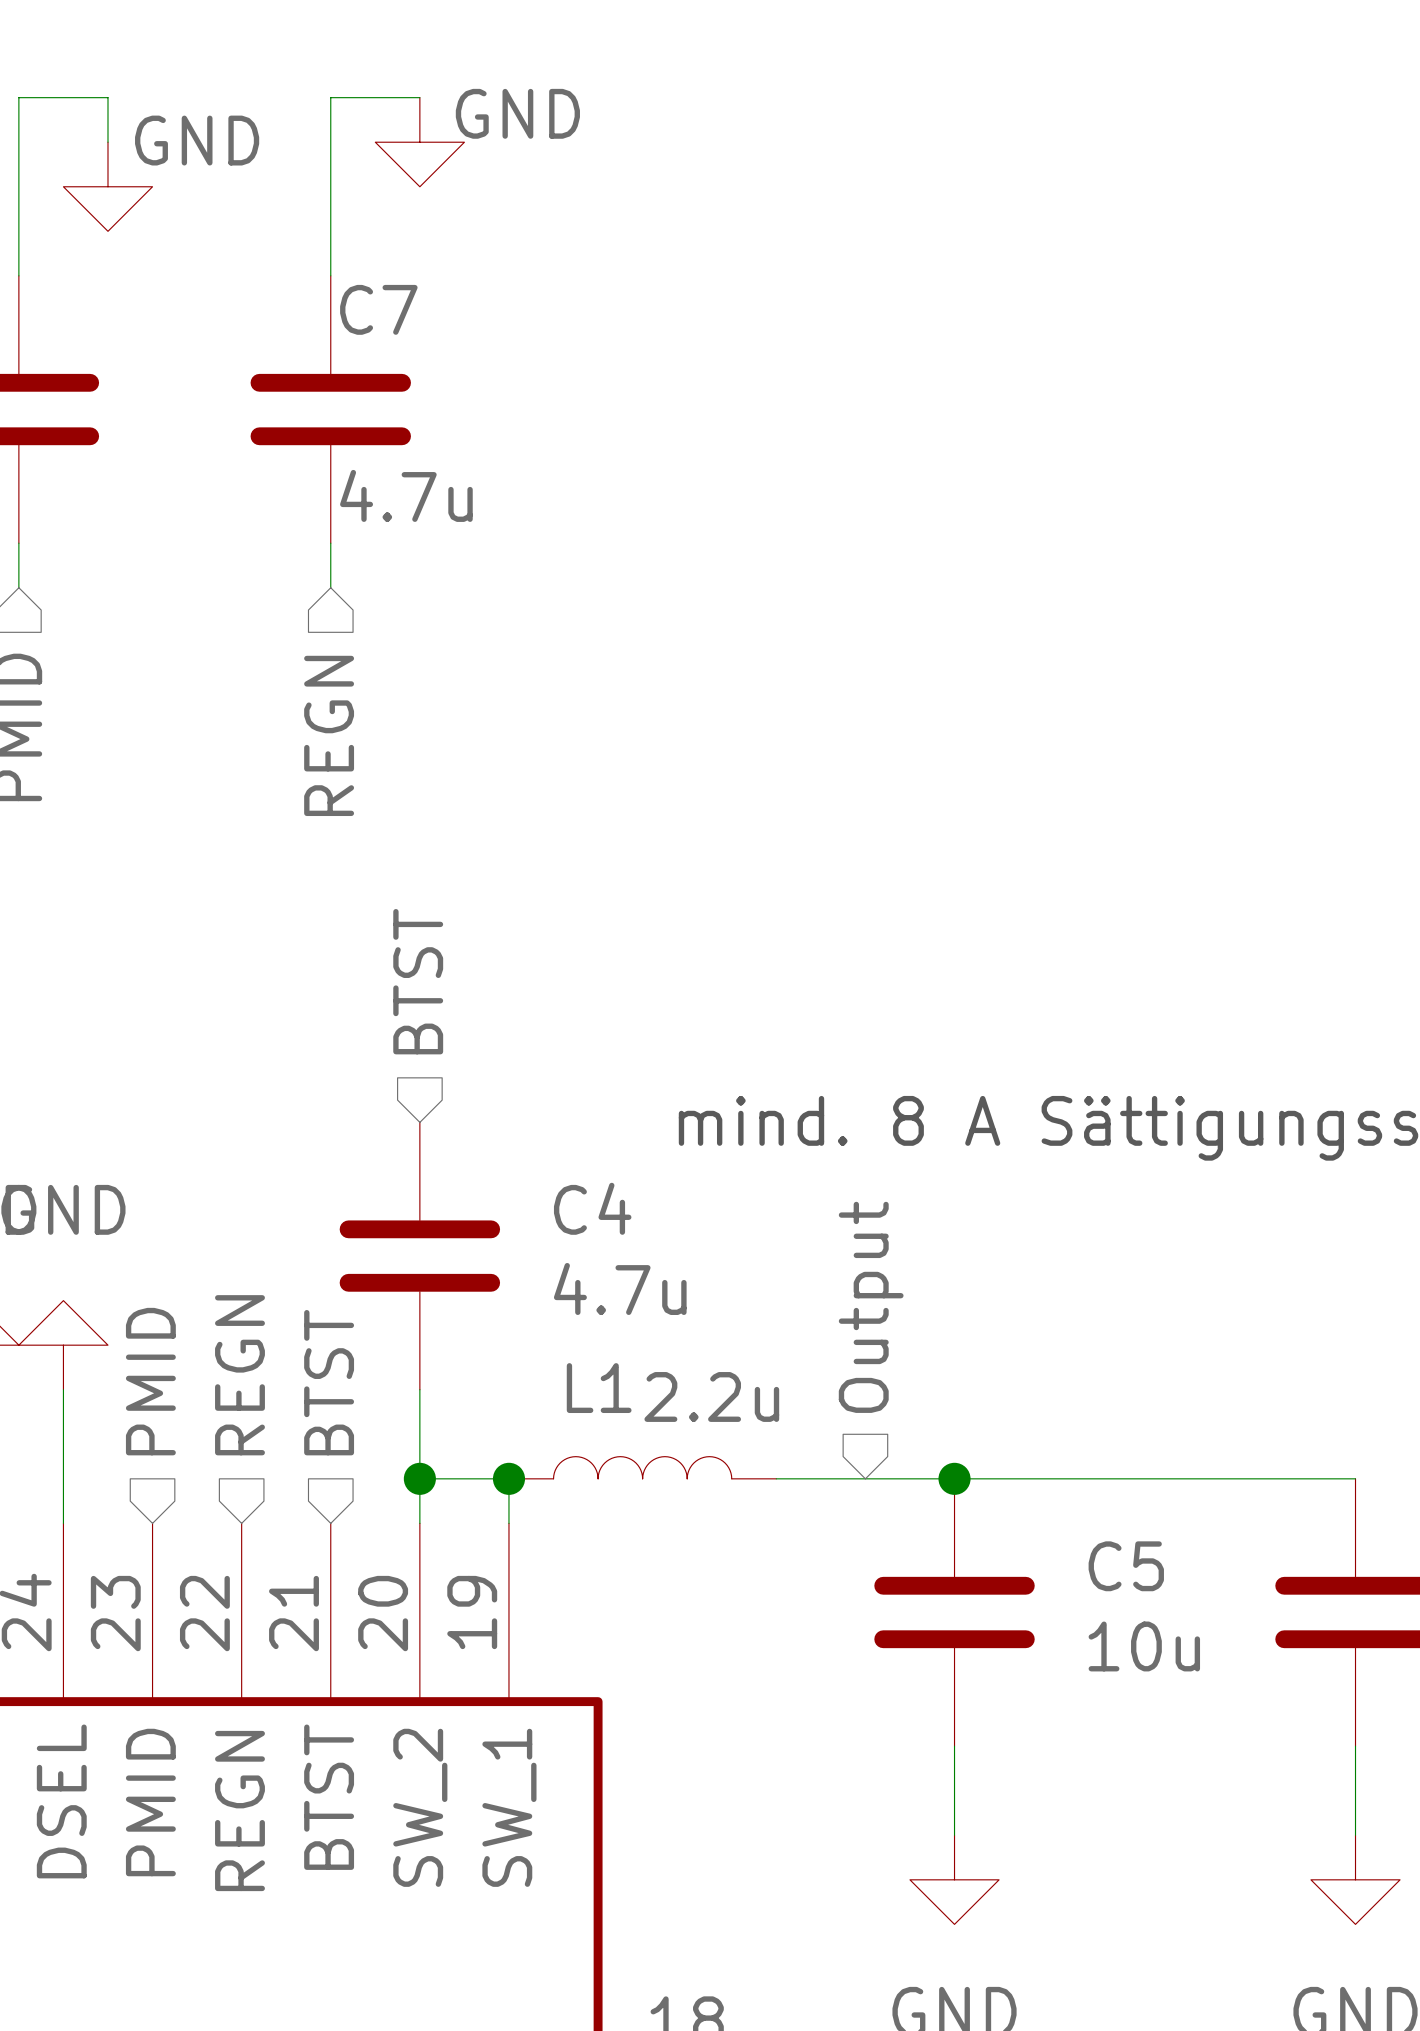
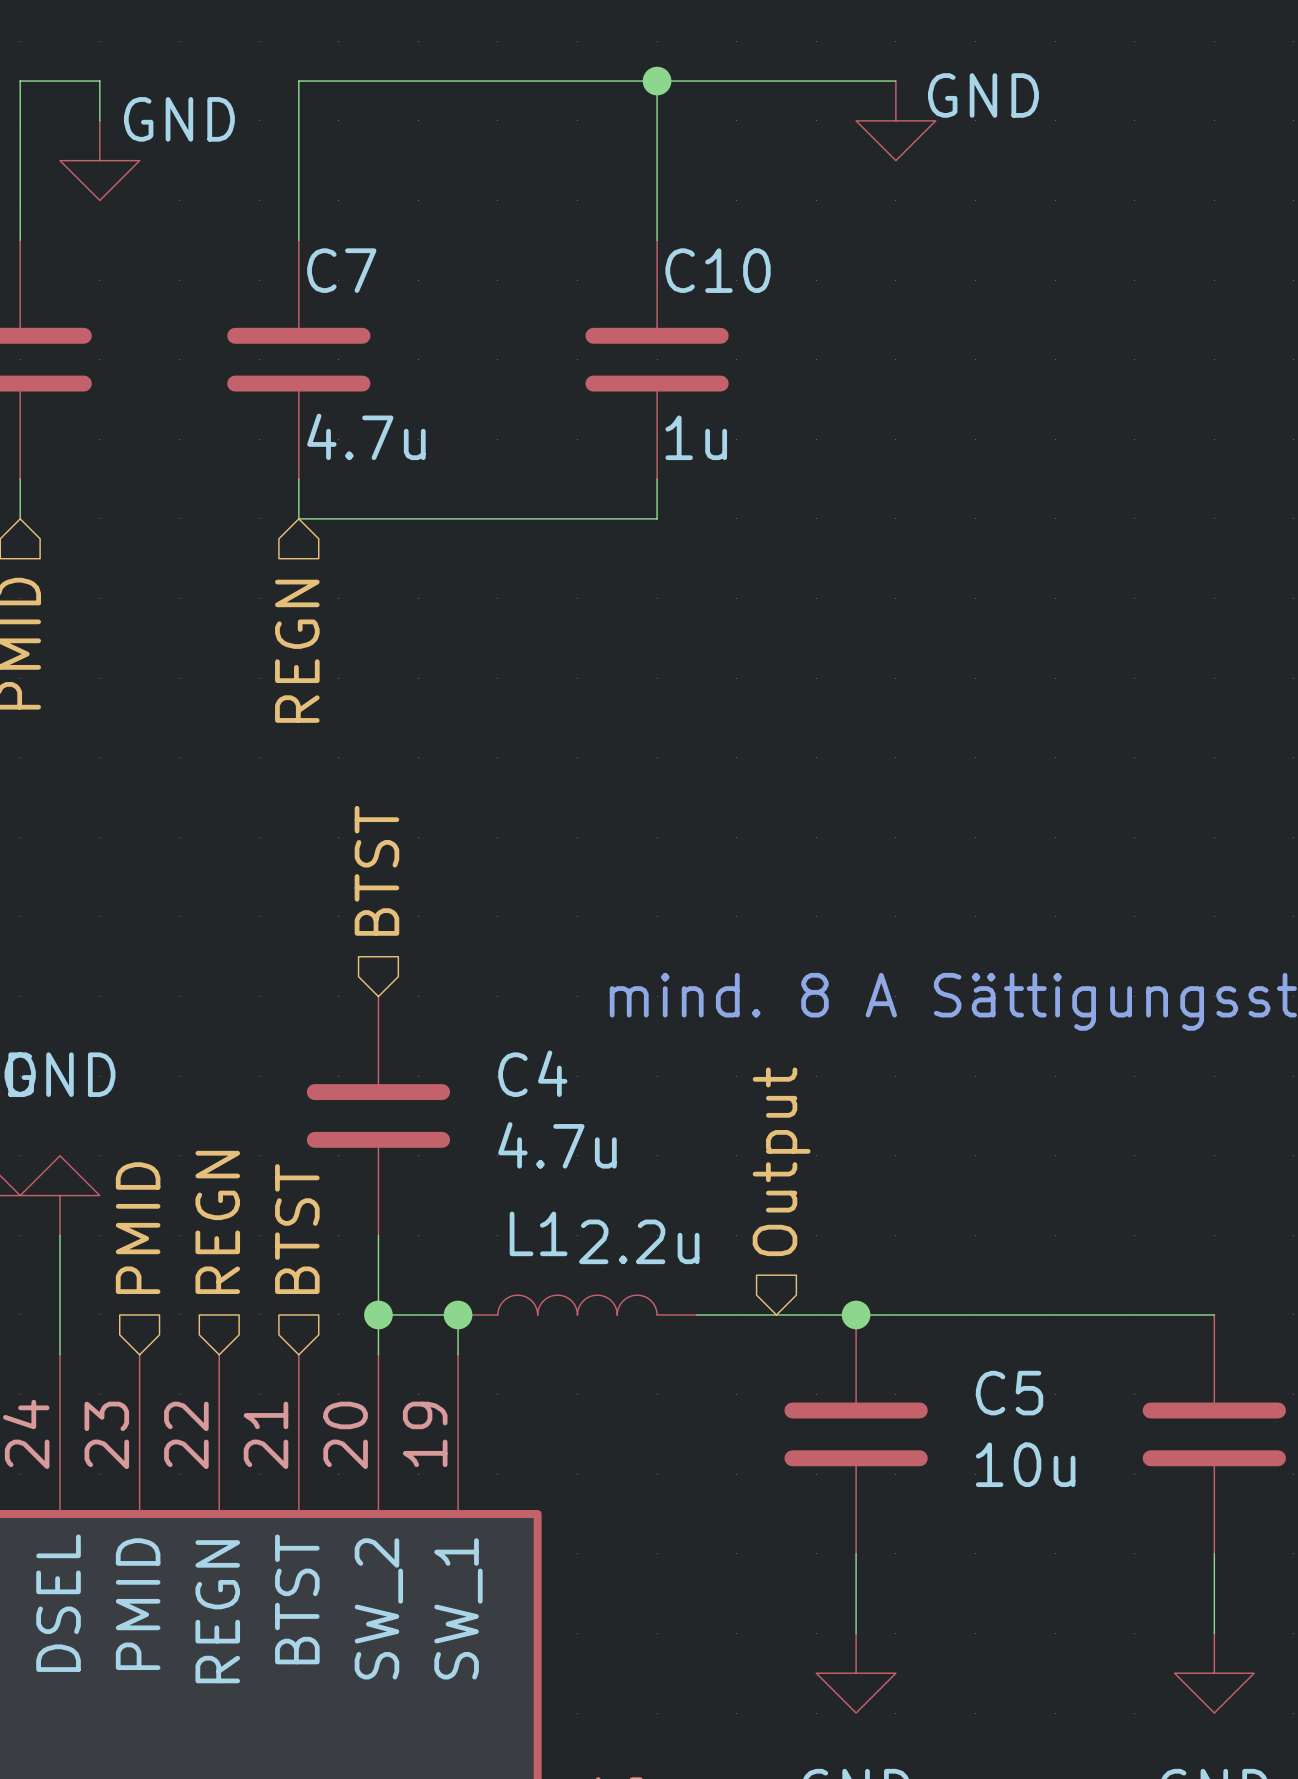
wire: none -> (378, 81) (895, 81)
wire: none -> (657, 81) (657, 240)
junction: none -> (657, 81)
power symbol position: GND (419, 142) -> GND (895, 120)
C10: none -> 1u (657, 359)
wire: none -> (657, 479) (657, 518) (298, 518)

